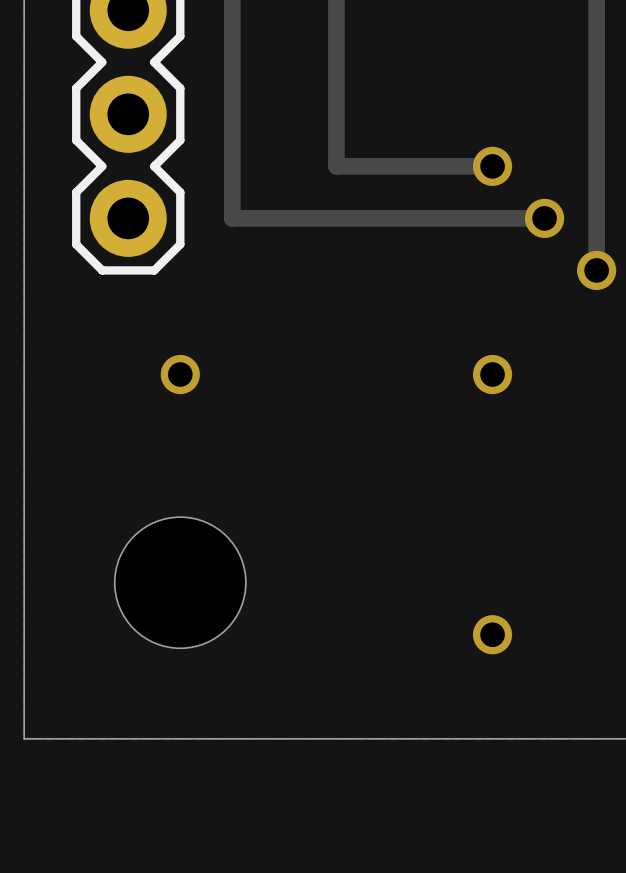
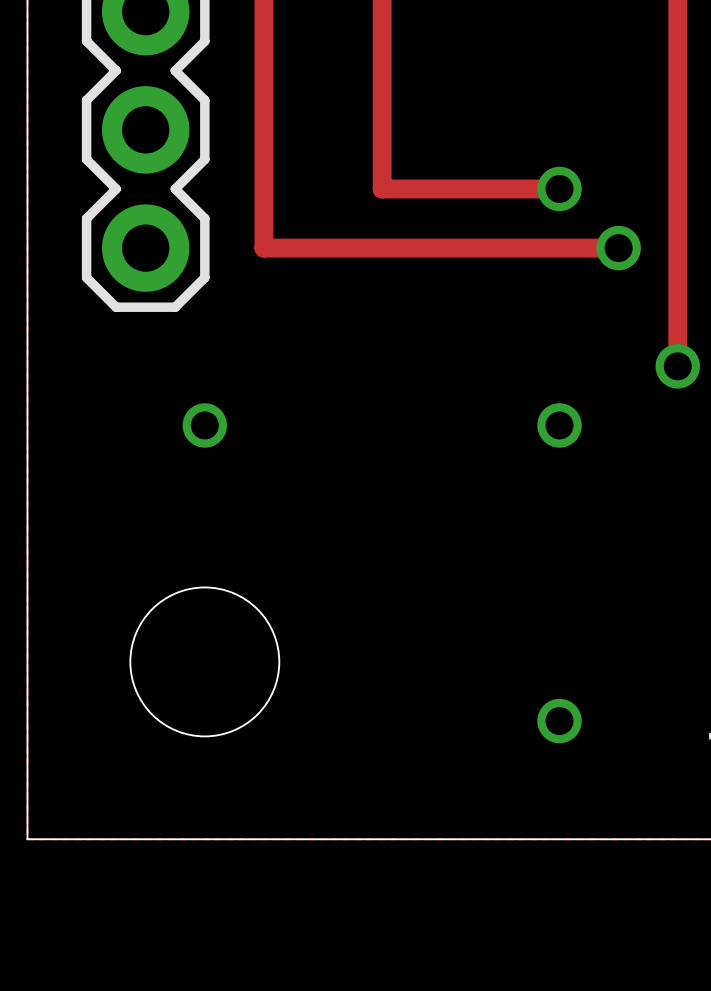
track: none -> (677, 307) (677, 366)
via position: (596, 270) -> (677, 366)

